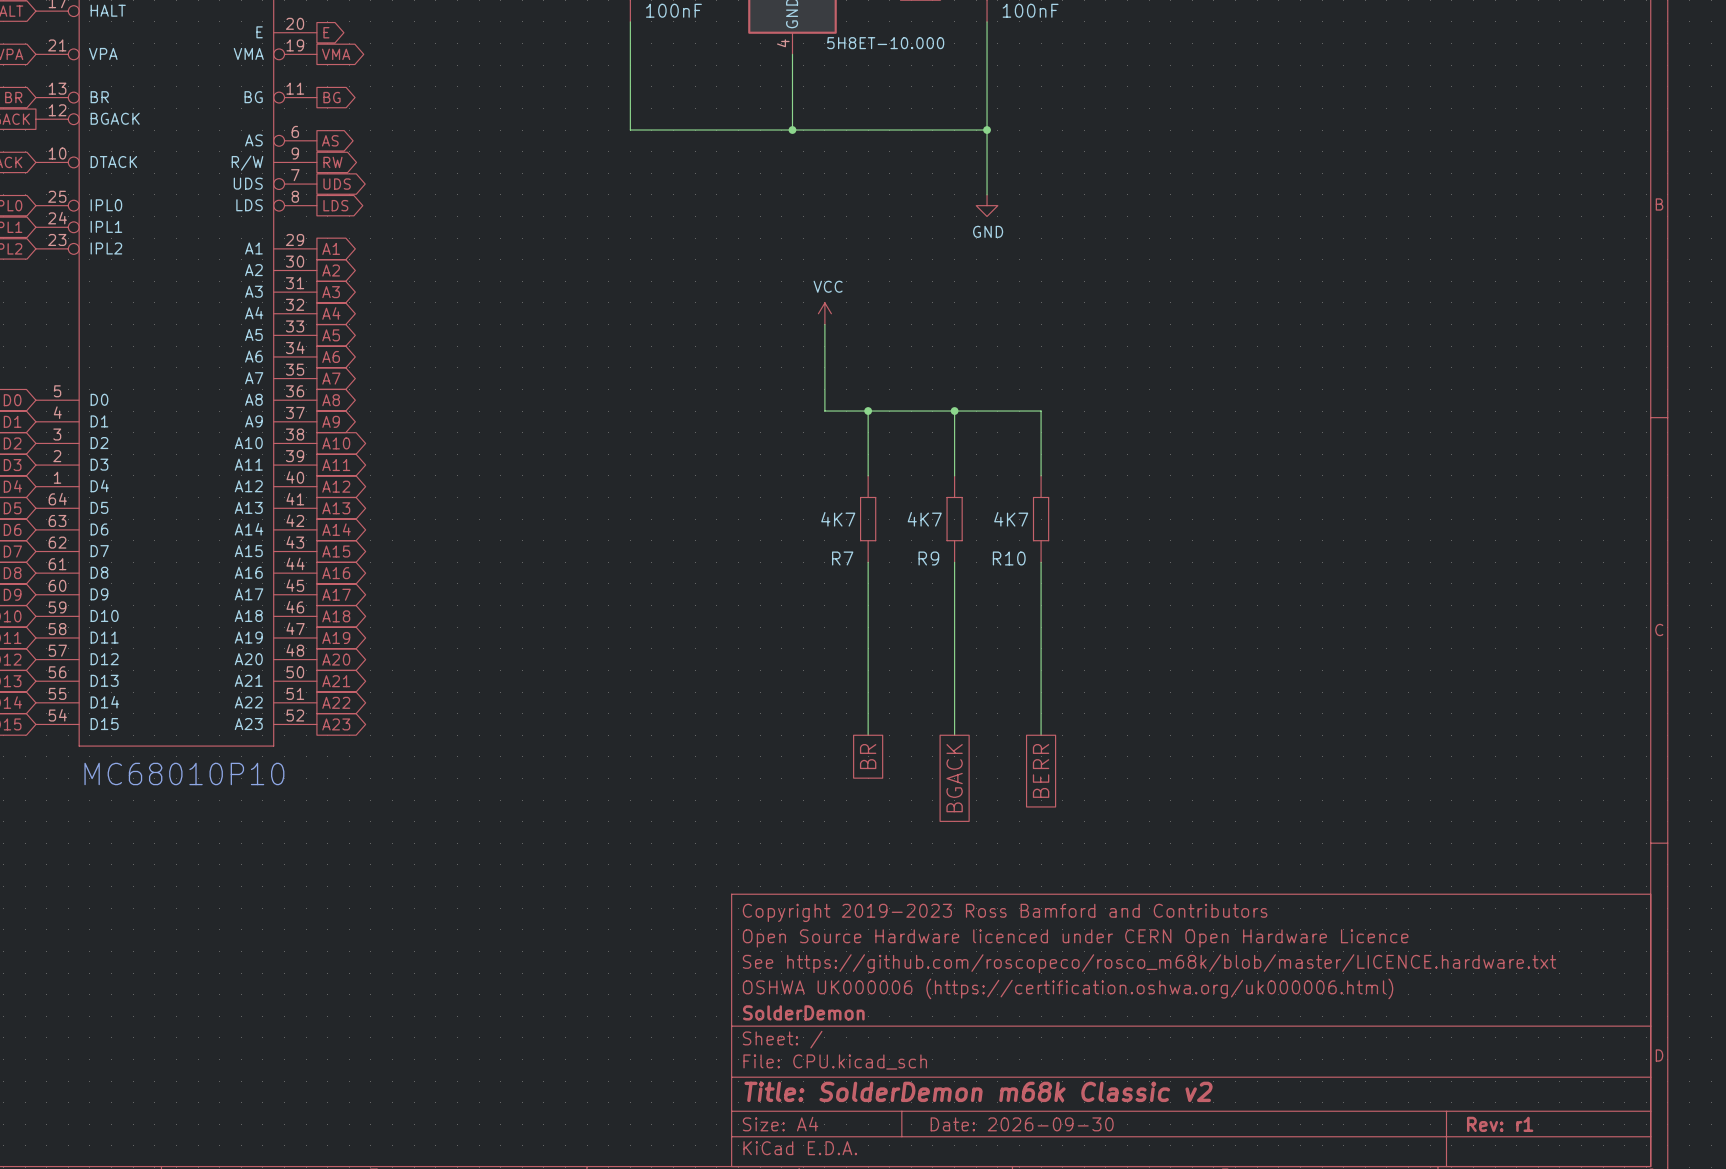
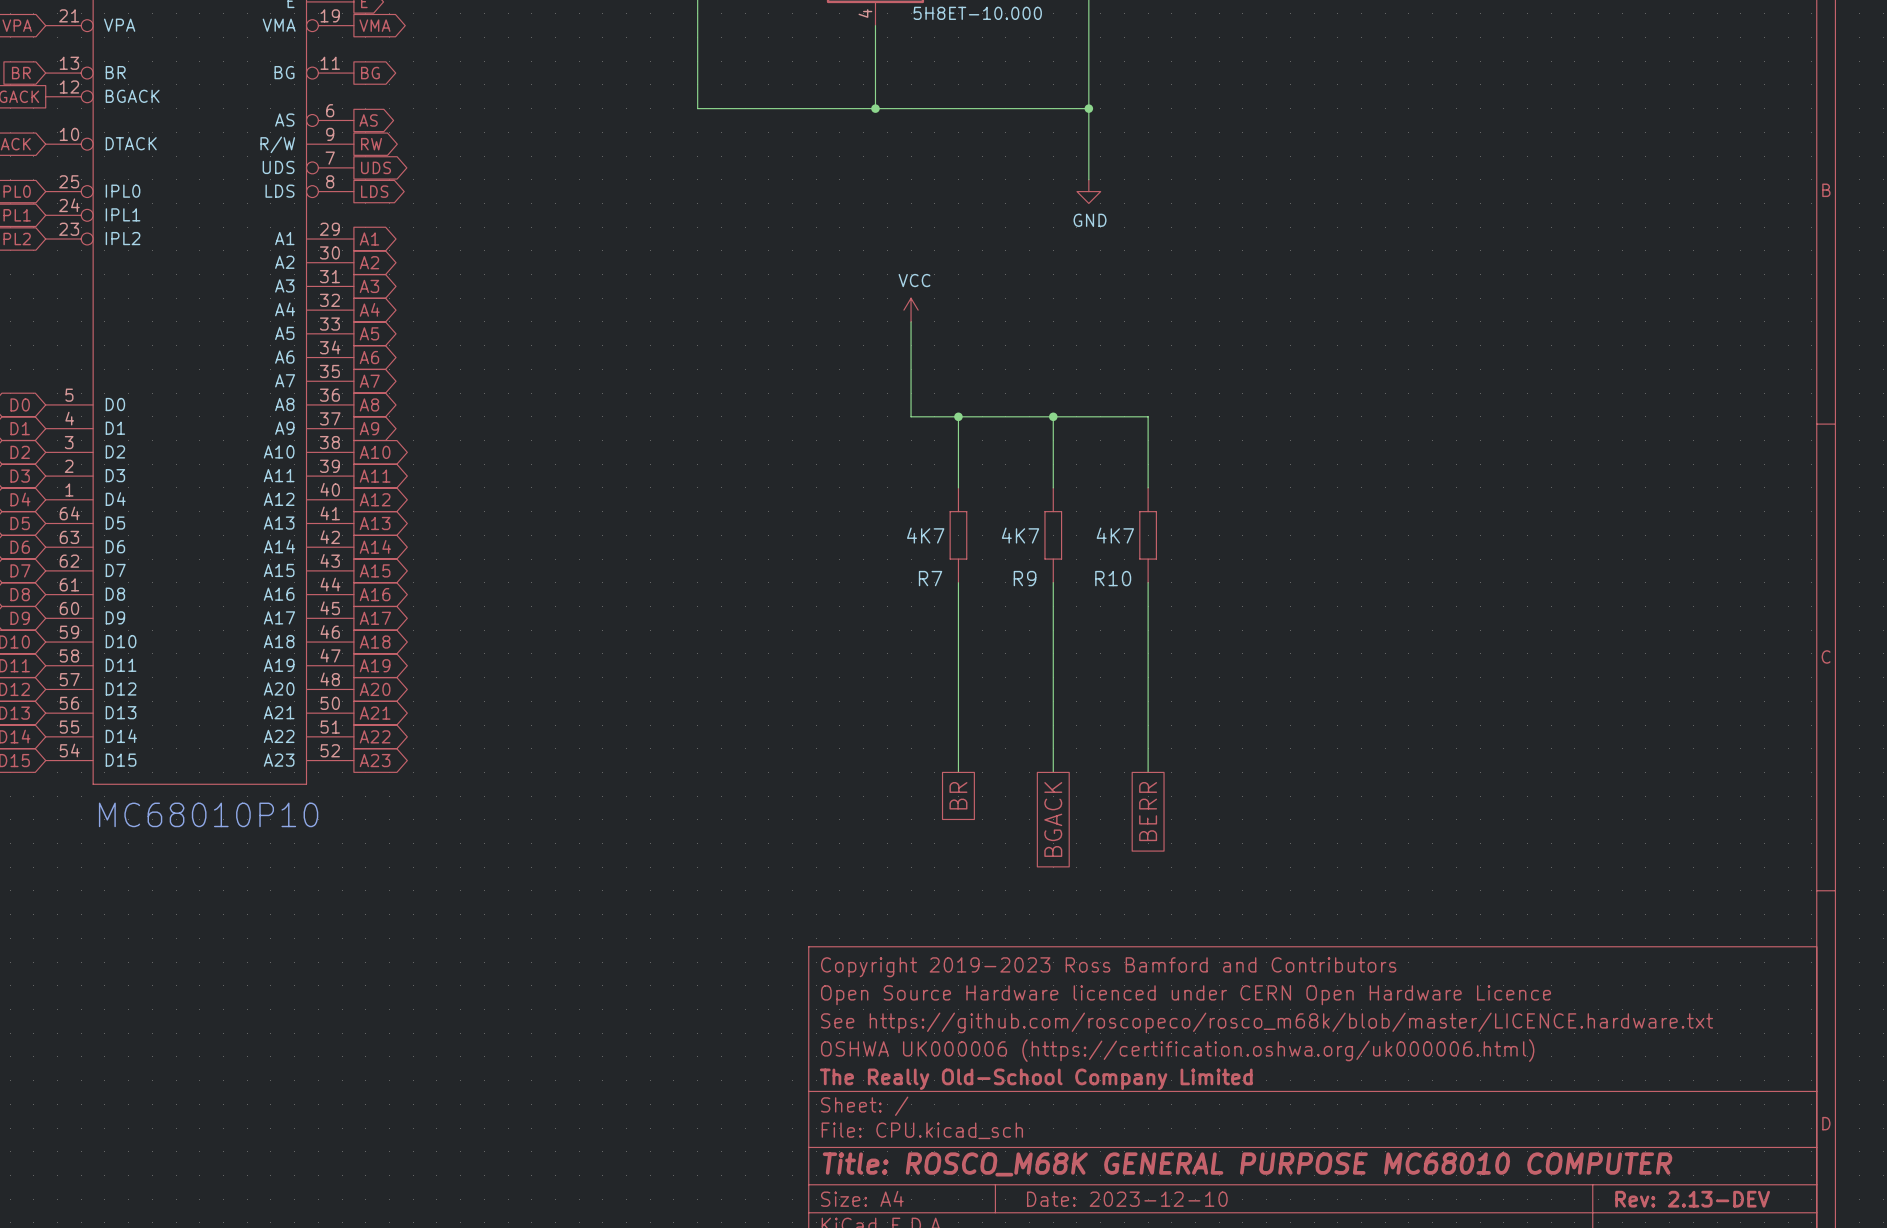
title block: SolderDemon (803, 1012) -> The Really Old-School Company Limited (1036, 1079)
title block: Title: SolderDemon m68k Classic v2 (978, 1091) -> Title: ROSCO_M68K GENERAL PURPOSE MC68010 COMPUTER (1247, 1164)
title block: Date: 2026-09-30 (1022, 1124) -> Date: 2023-12-10 (1127, 1199)
title block: Rev: r1 (1500, 1124) -> Rev: 2.13-DEV (1692, 1199)

